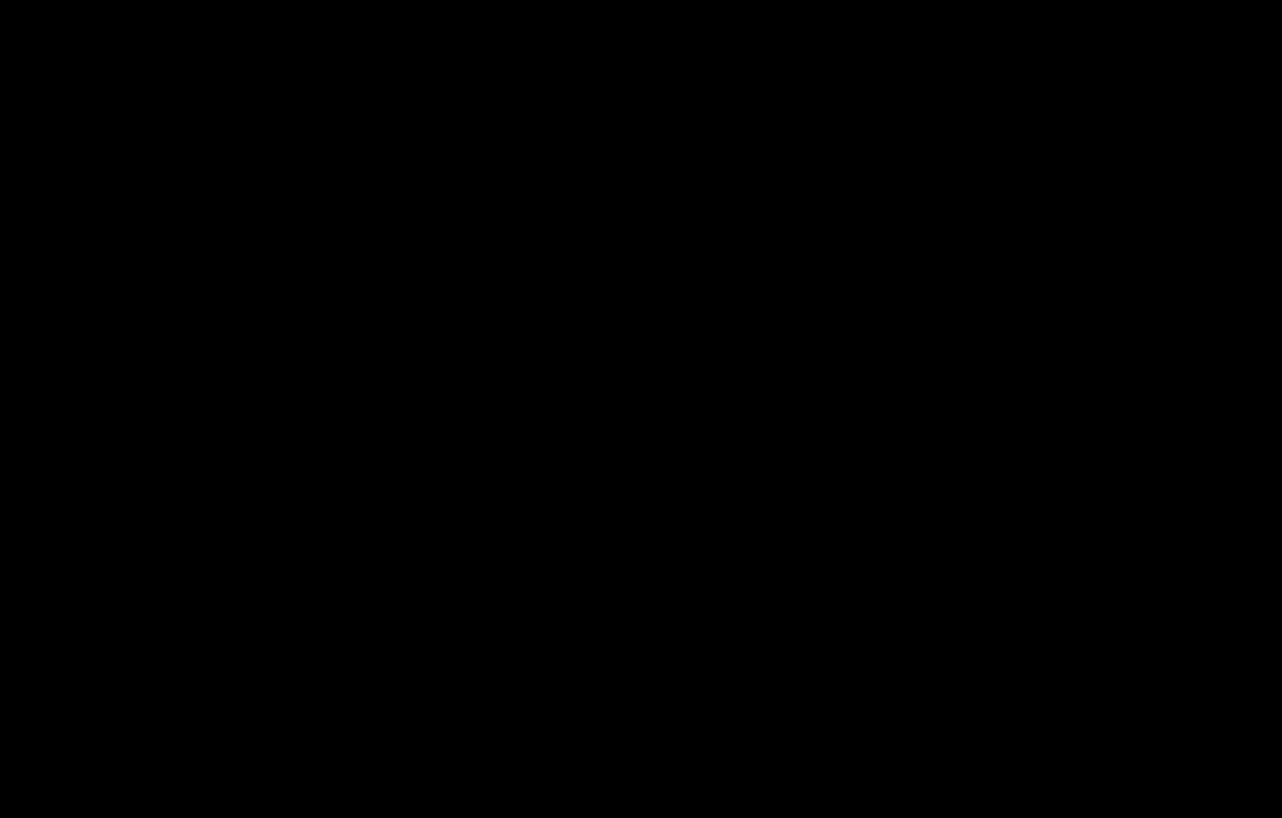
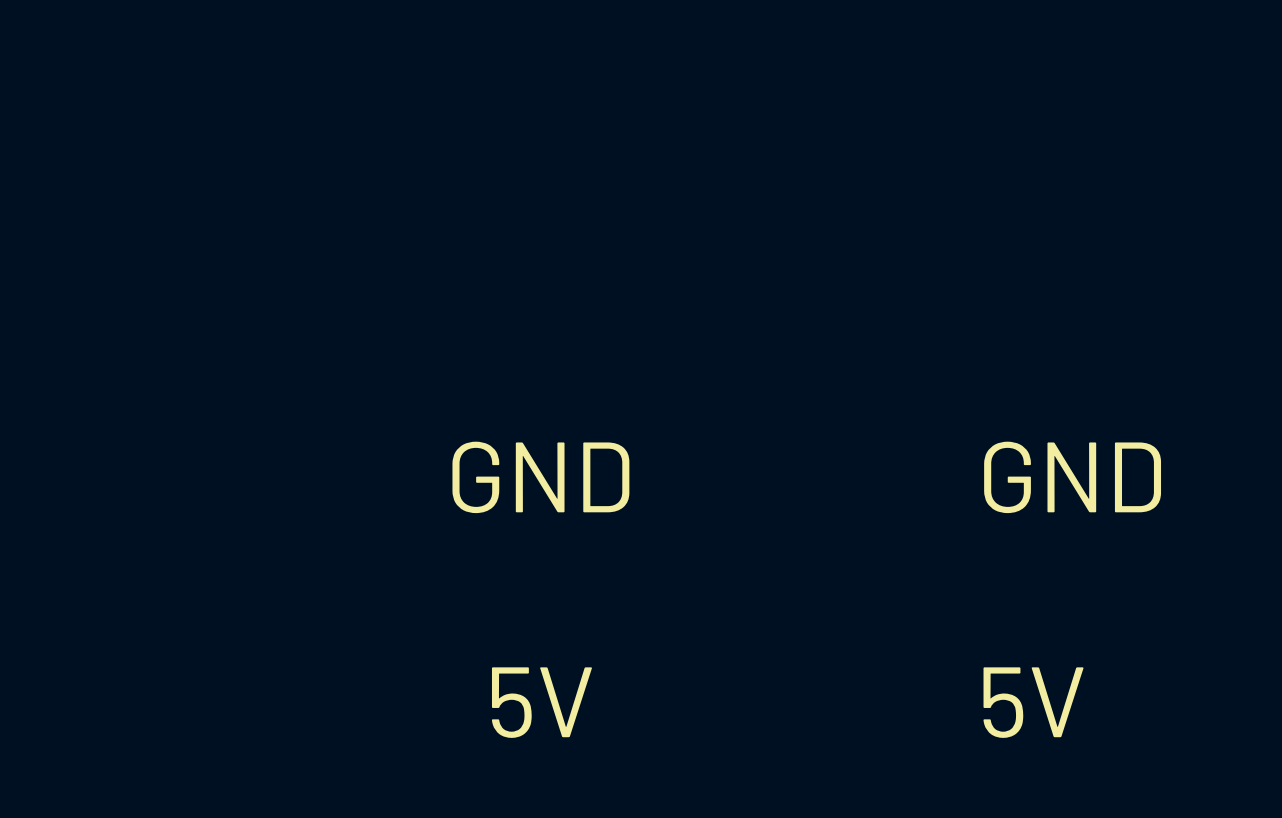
text: none -> GND (540, 477)
text: none -> GND (1072, 477)
text: none -> 5V (542, 702)
text: none -> 5V (1033, 702)

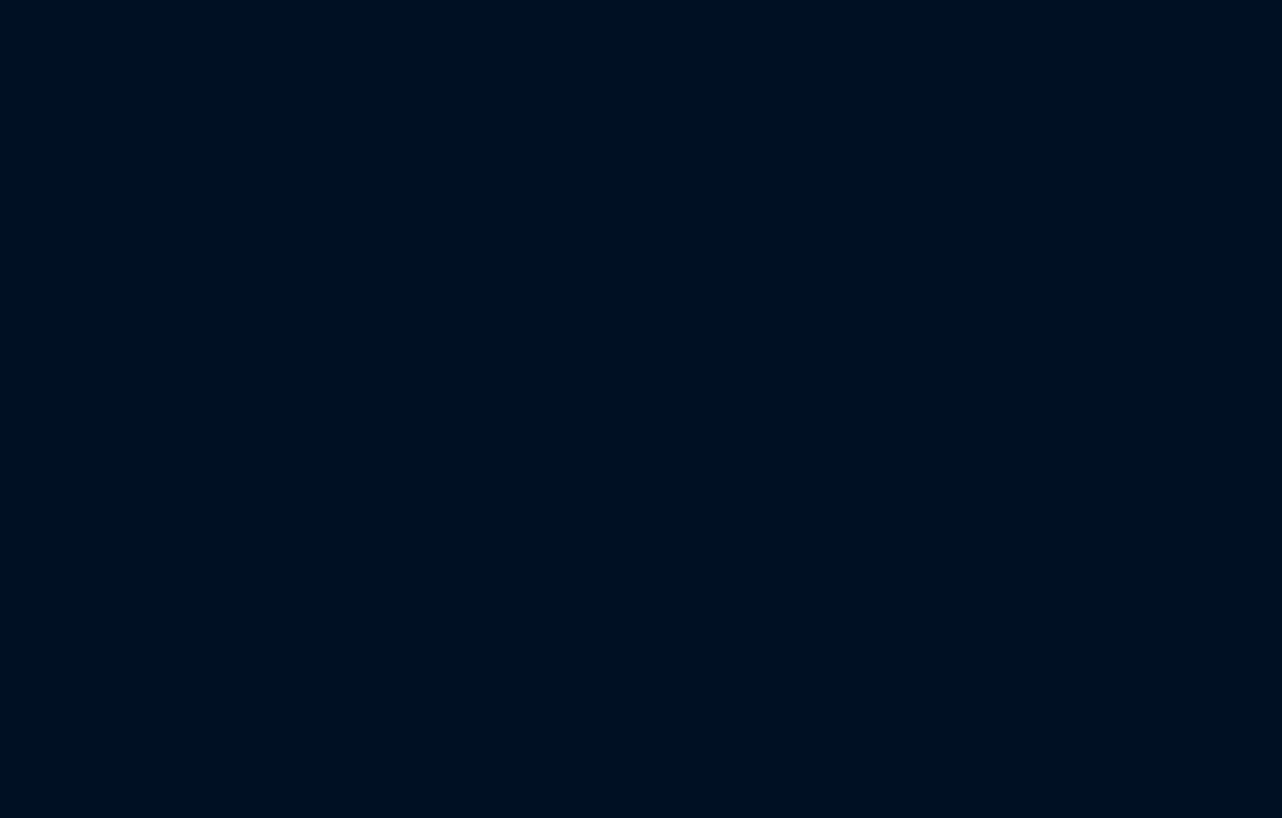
text: GND (540, 477) -> none
text: GND (1072, 477) -> none
text: 5V (542, 702) -> none
text: 5V (1033, 702) -> none

